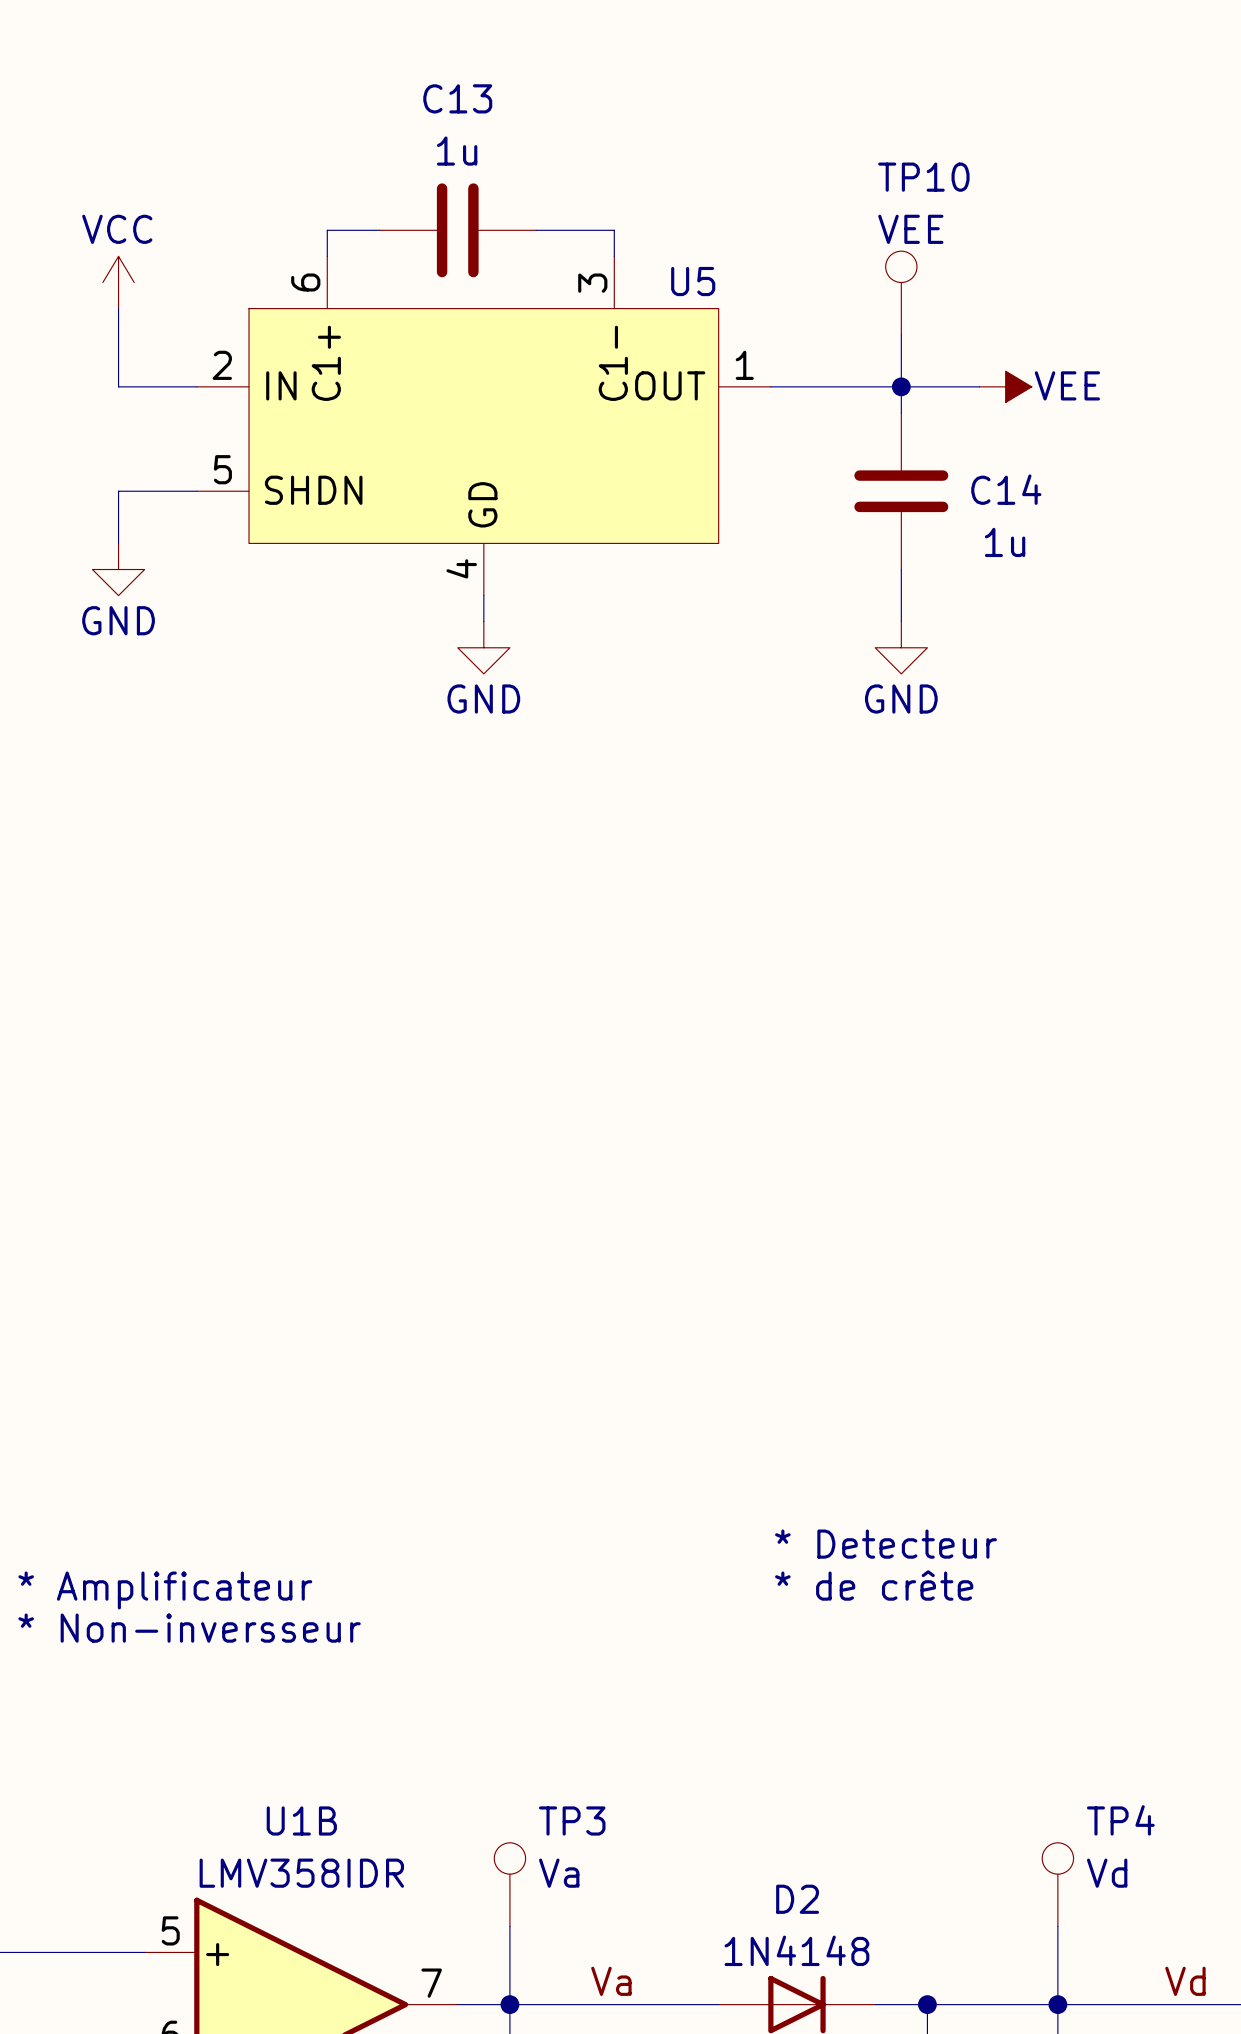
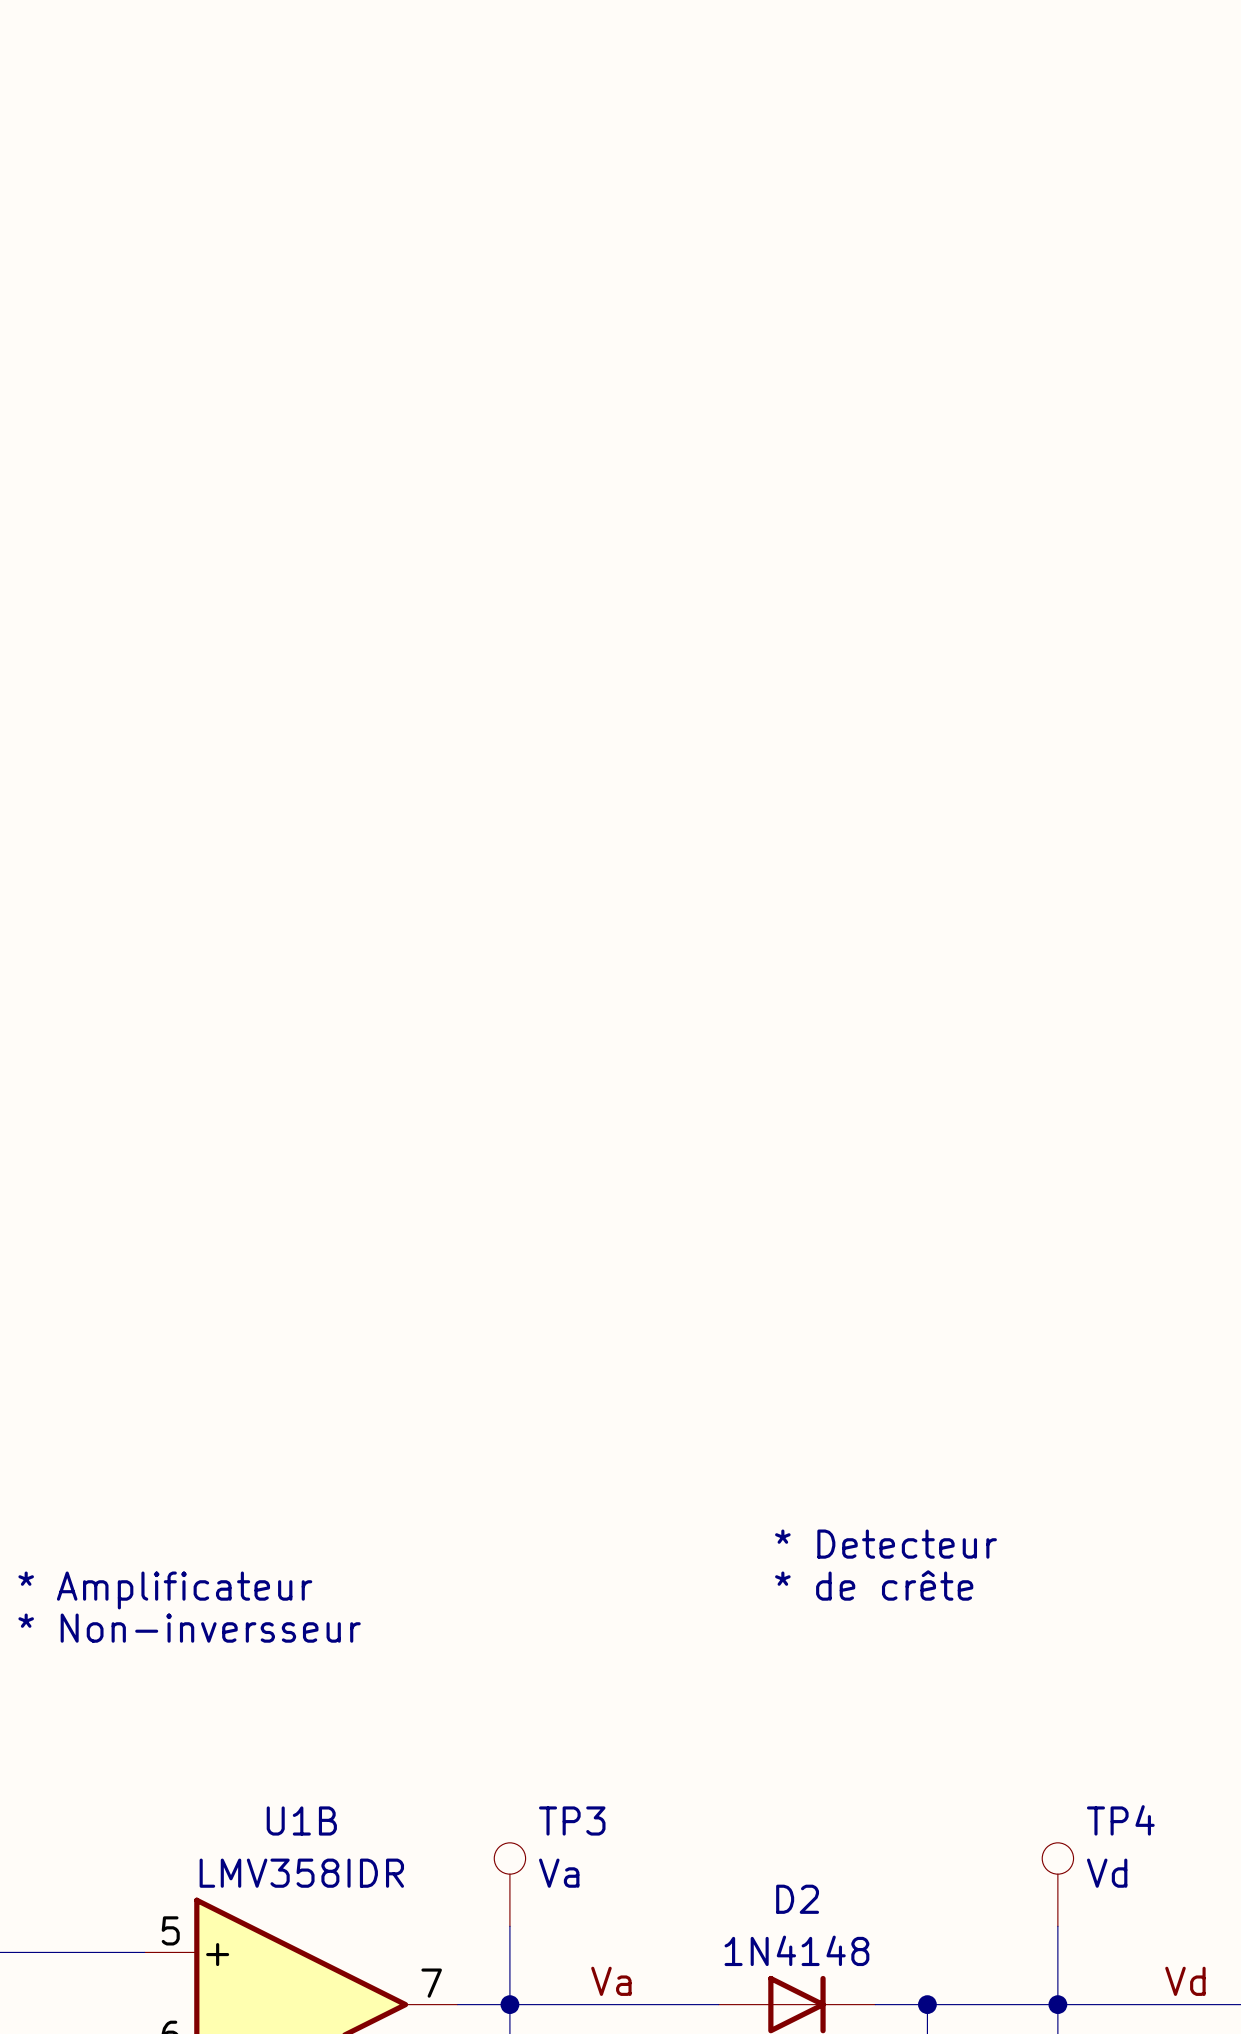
wire: (379, 230) (327, 230) (327, 256) -> none
C13: 1u (457, 230) -> none
wire: (536, 230) (614, 230) (614, 256) -> none
power symbol: VCC (118, 282) -> none
TP10: VEE (901, 292) -> none
wire: (118, 308) (118, 386) (196, 386) -> none
wire: (901, 334) (901, 412) -> none
wire: (770, 386) (979, 386) -> none
junction: (901, 386) -> none
power symbol: VEE (1005, 386) -> none
U5: (483, 426) -> none
wire: (196, 491) (118, 491) (118, 543) -> none
C14: 1u (901, 491) -> none
power symbol: GND (118, 569) -> none
wire: (901, 569) (901, 621) -> none
wire: (483, 595) (483, 621) -> none
power symbol: GND (483, 647) -> none
power symbol: GND (901, 647) -> none

